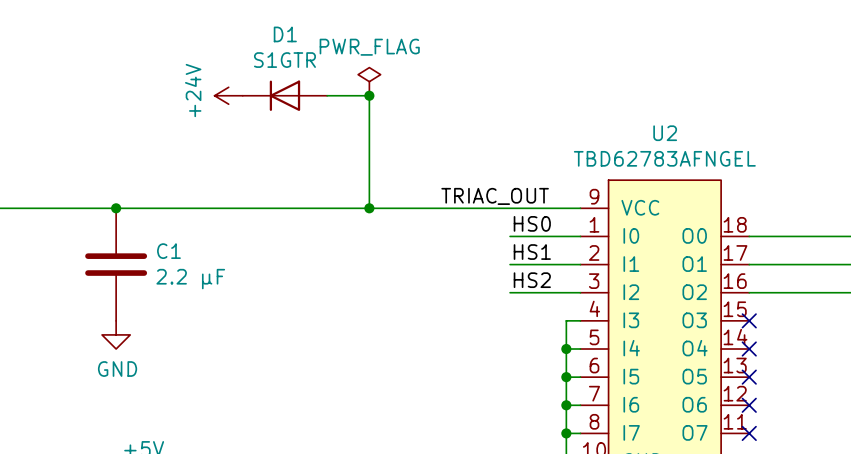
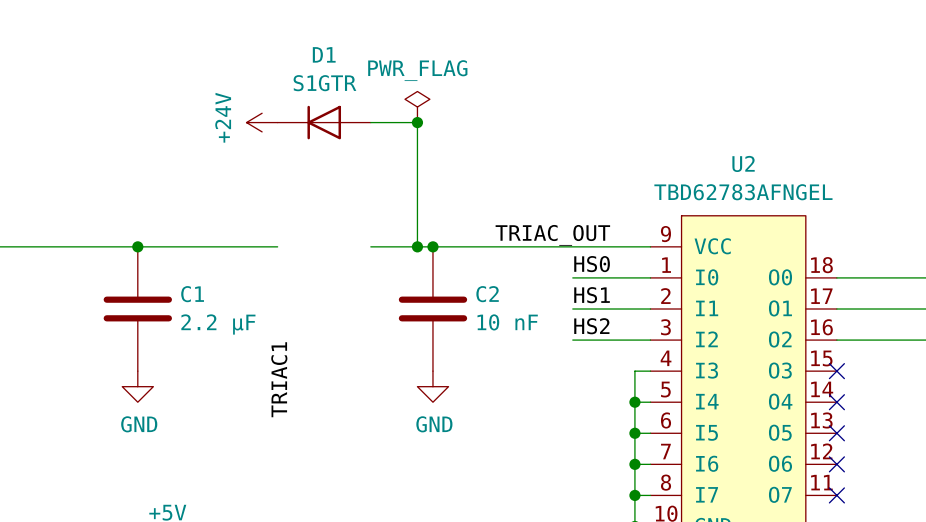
wire: (242, 208) (327, 208) -> none
junction: none -> (432, 246)
C2: none -> 10 nF (432, 309)
label: none -> TRIAC1 (279, 379)
power symbol: none -> GND (432, 386)

